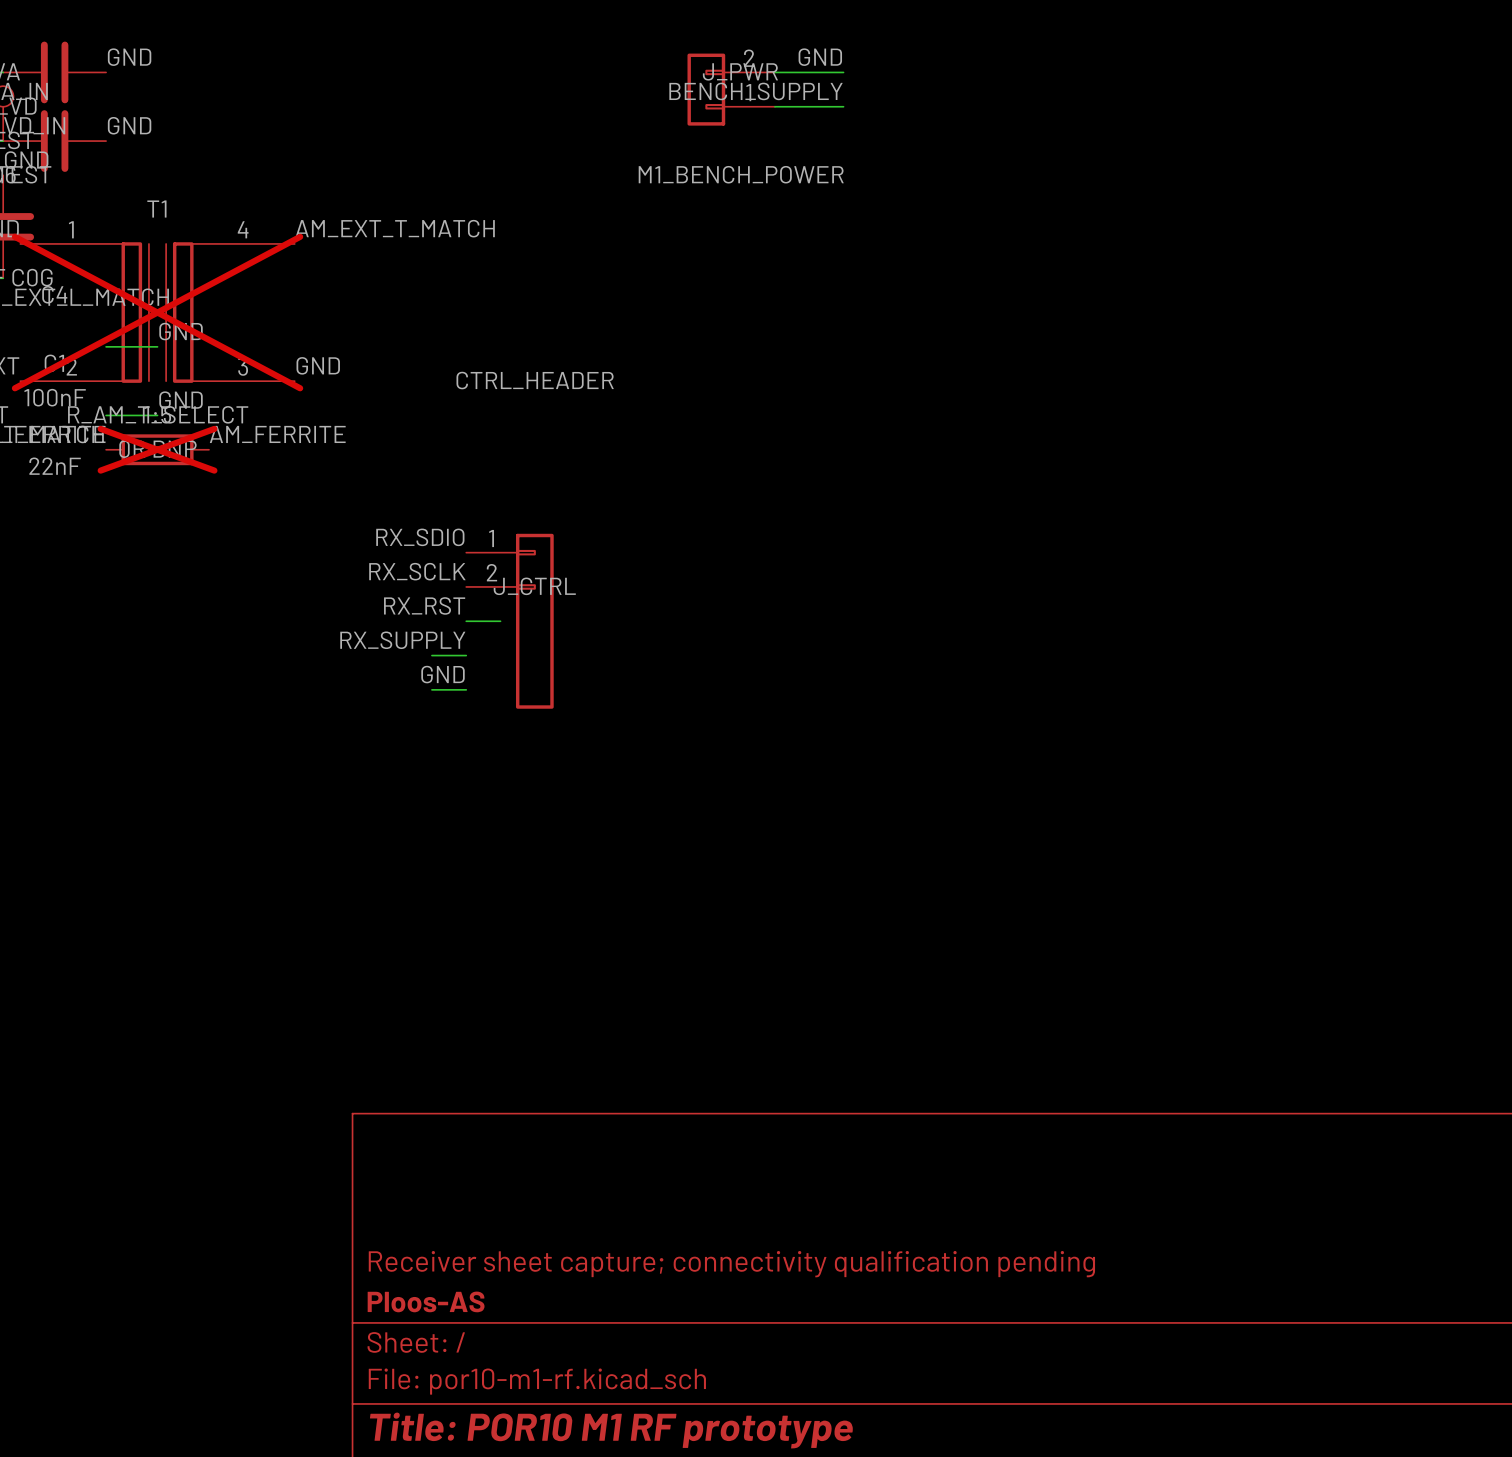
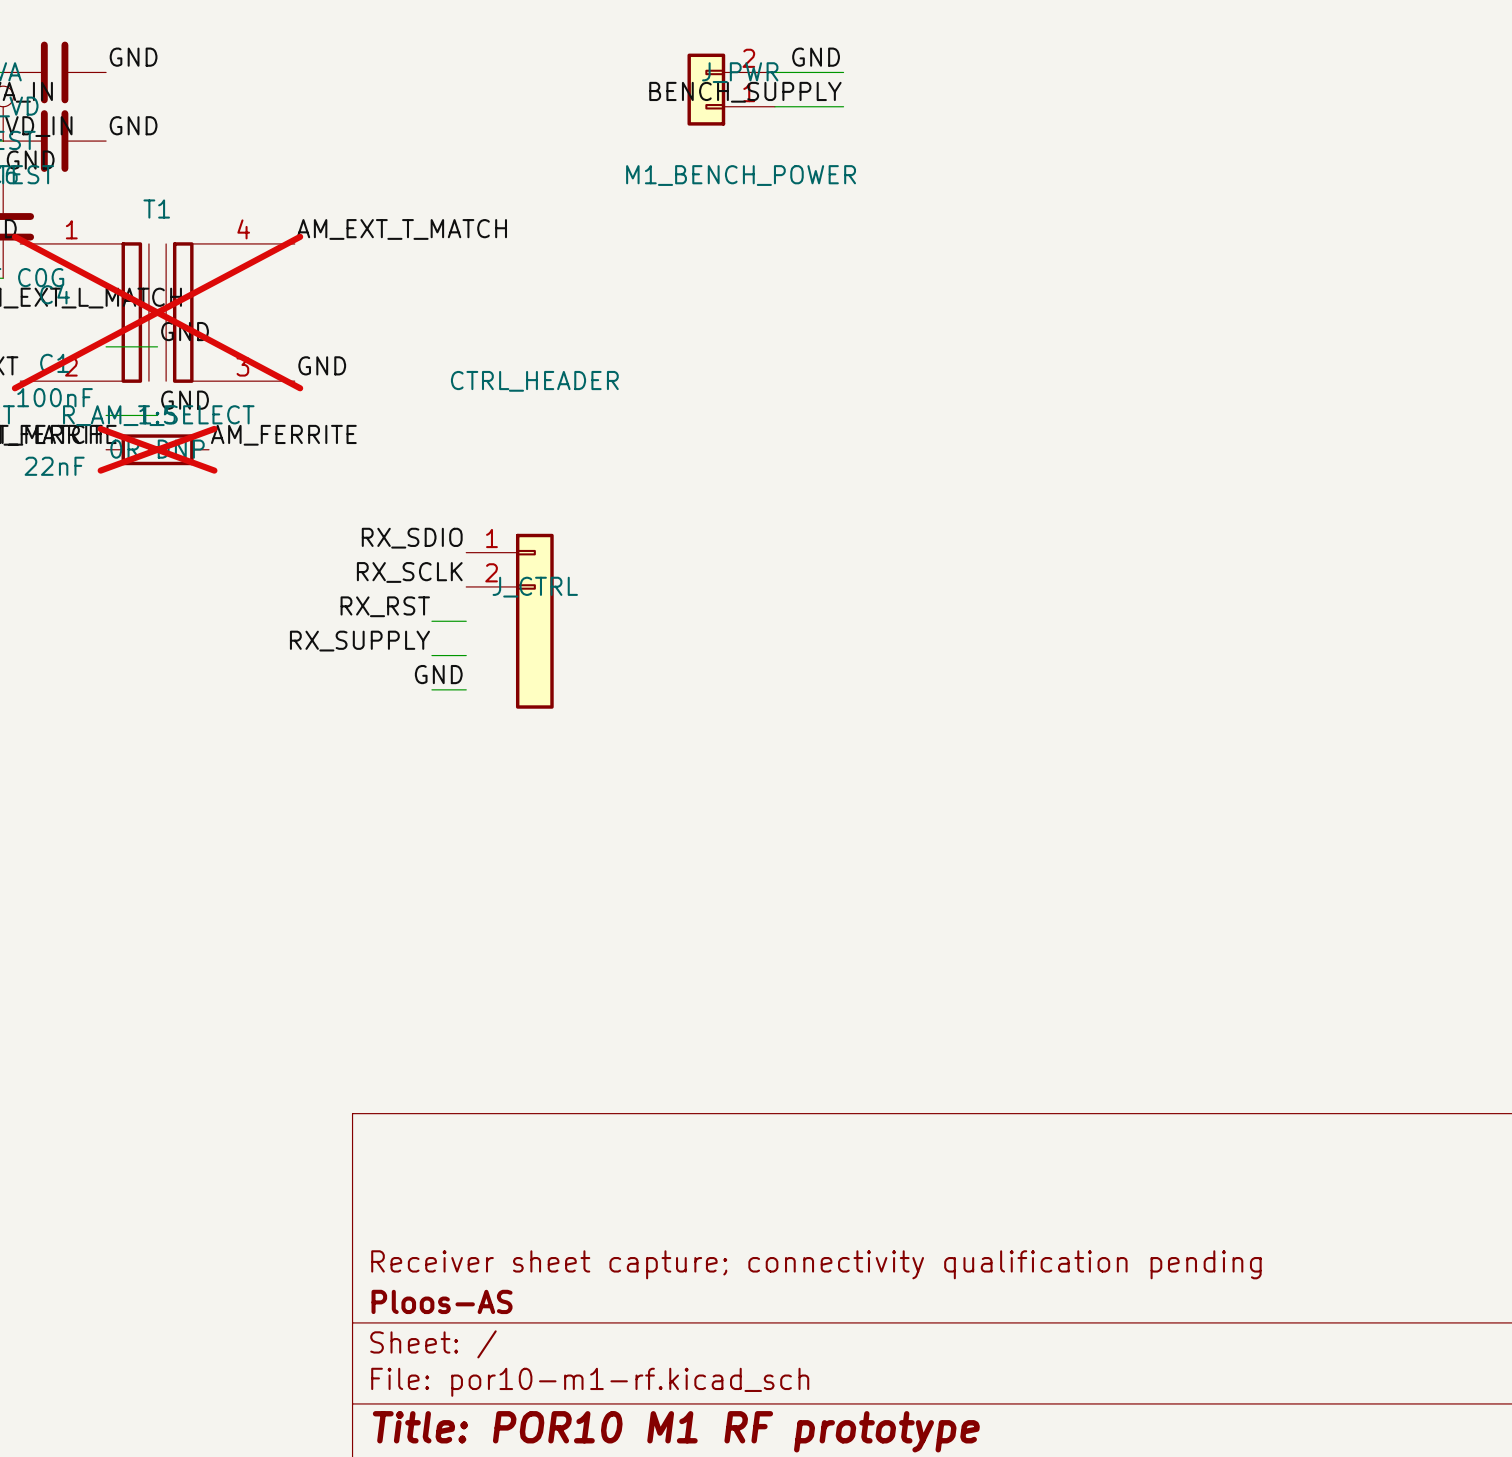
label position: RX_RST (424, 605) -> RX_RST (385, 606)
wire: (466, 621) (500, 621) -> (466, 621) (431, 621)
label position: RX_SUPPLY (402, 640) -> RX_SUPPLY (359, 641)

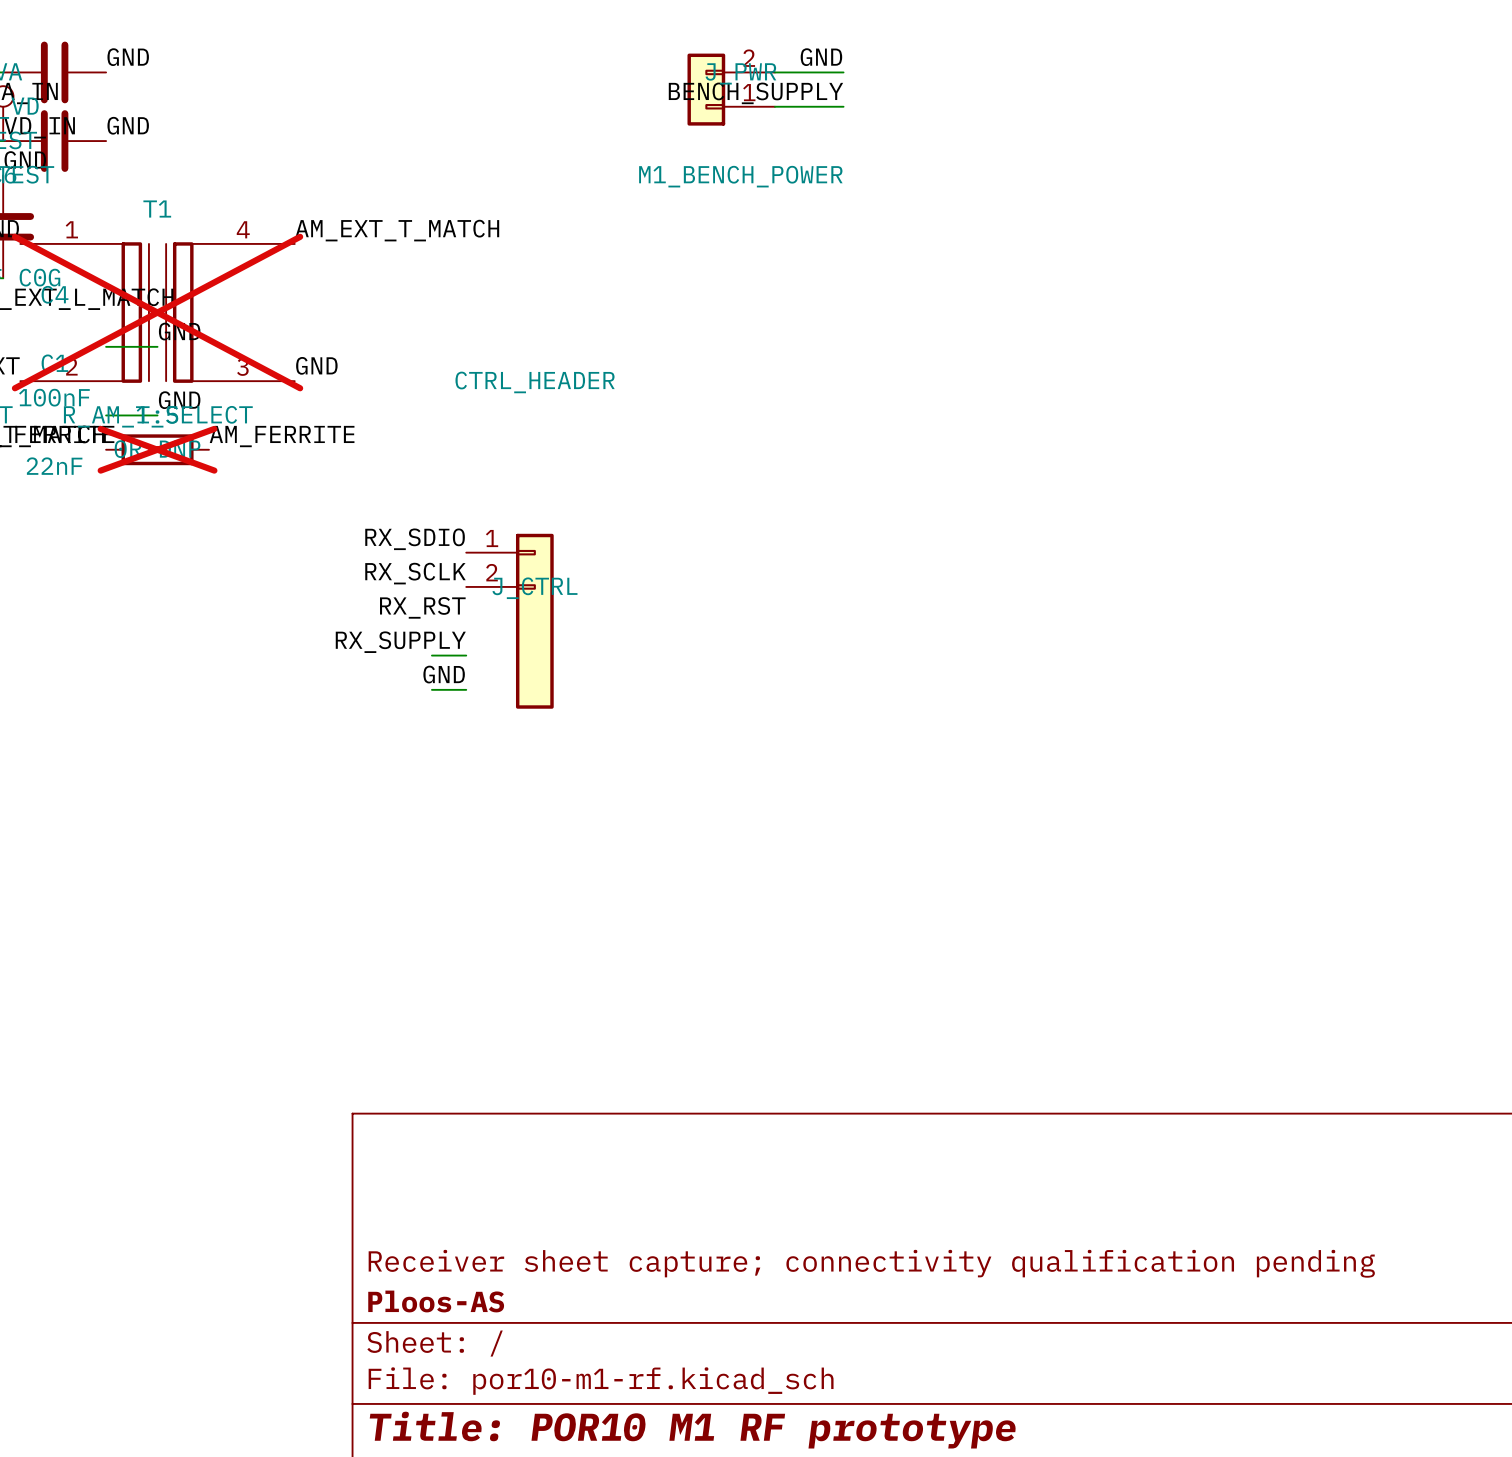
label position: RX_RST (385, 606) -> RX_RST (422, 607)
wire: (431, 621) (466, 621) -> none
label position: RX_SUPPLY (359, 641) -> RX_SUPPLY (400, 642)

